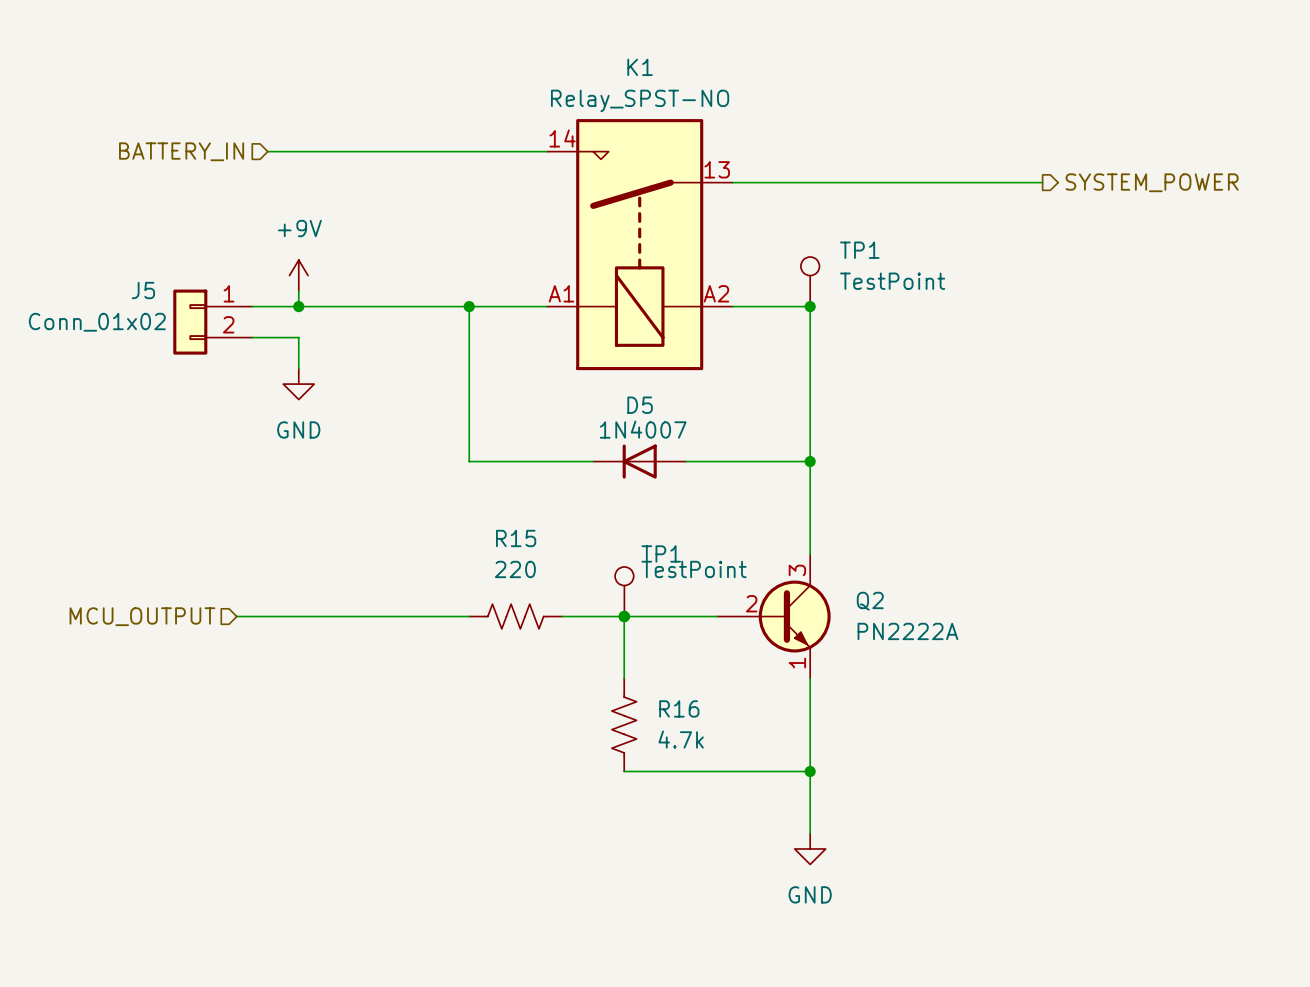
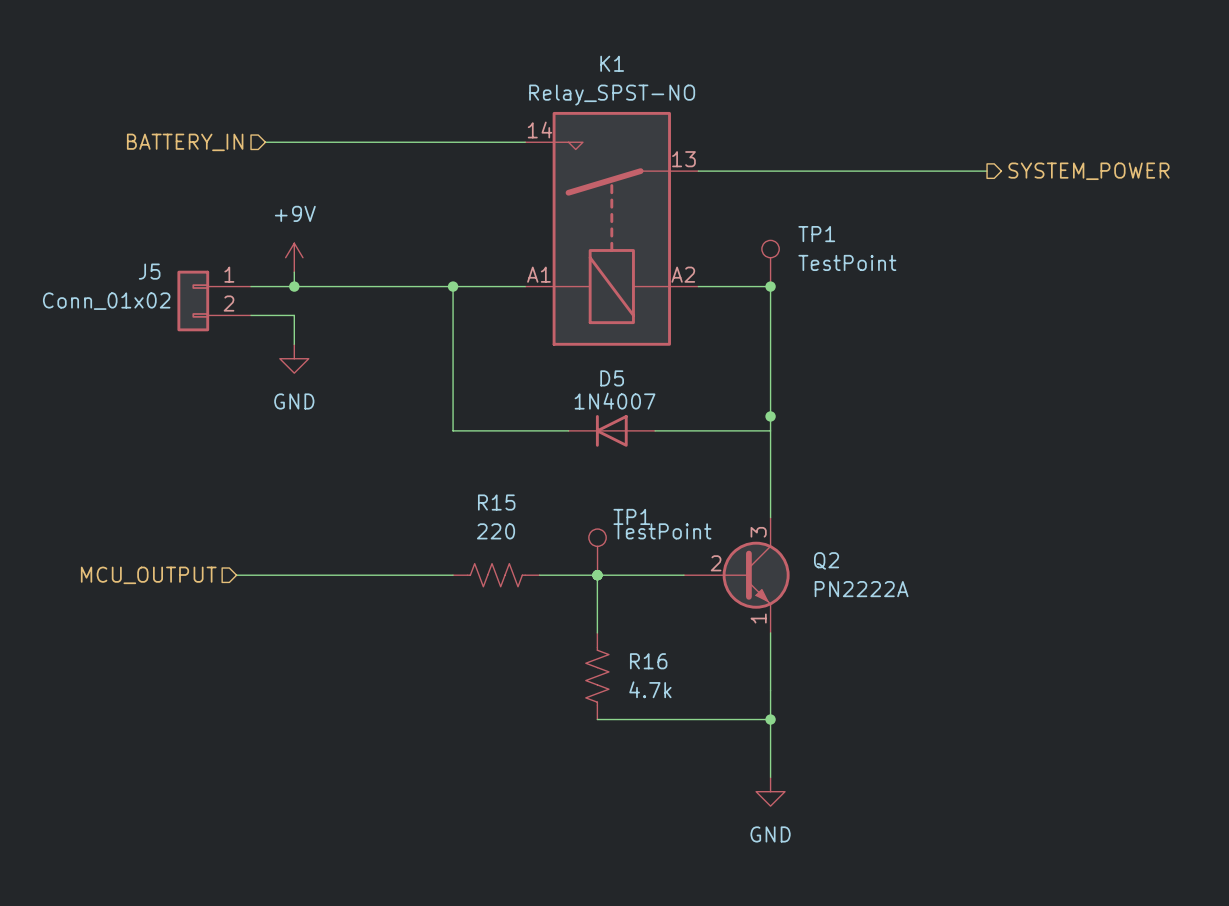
junction position: (810, 461) -> (770, 416)

